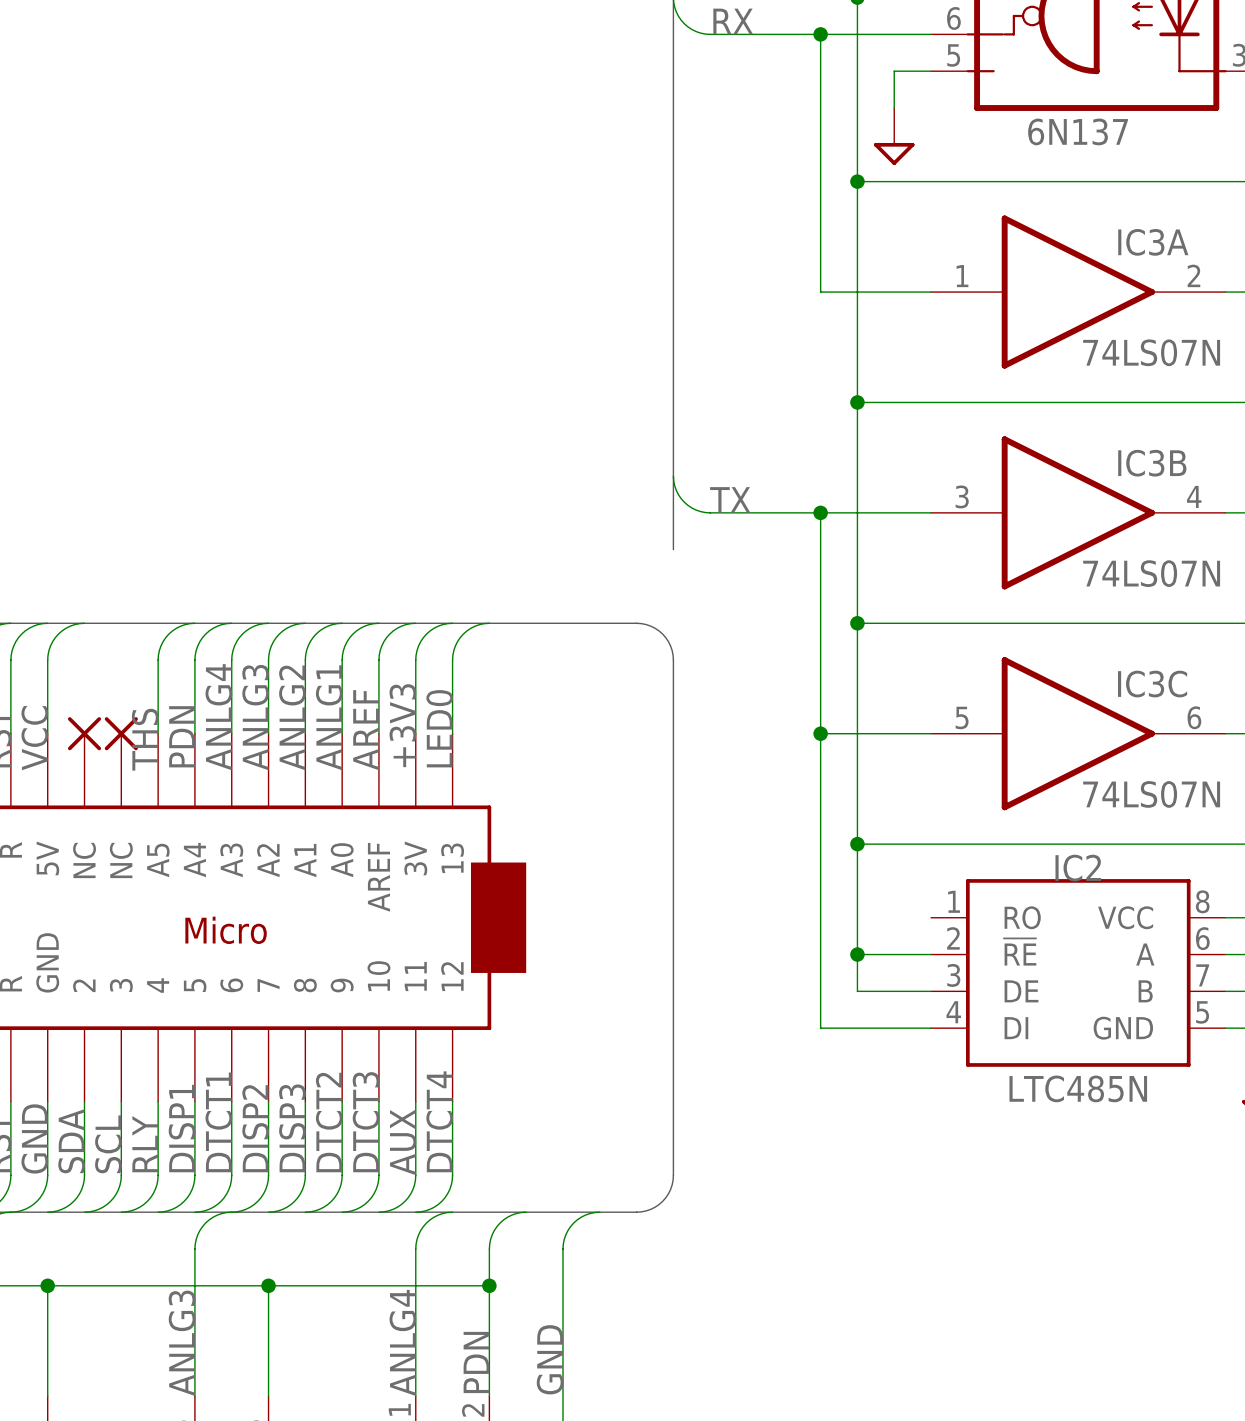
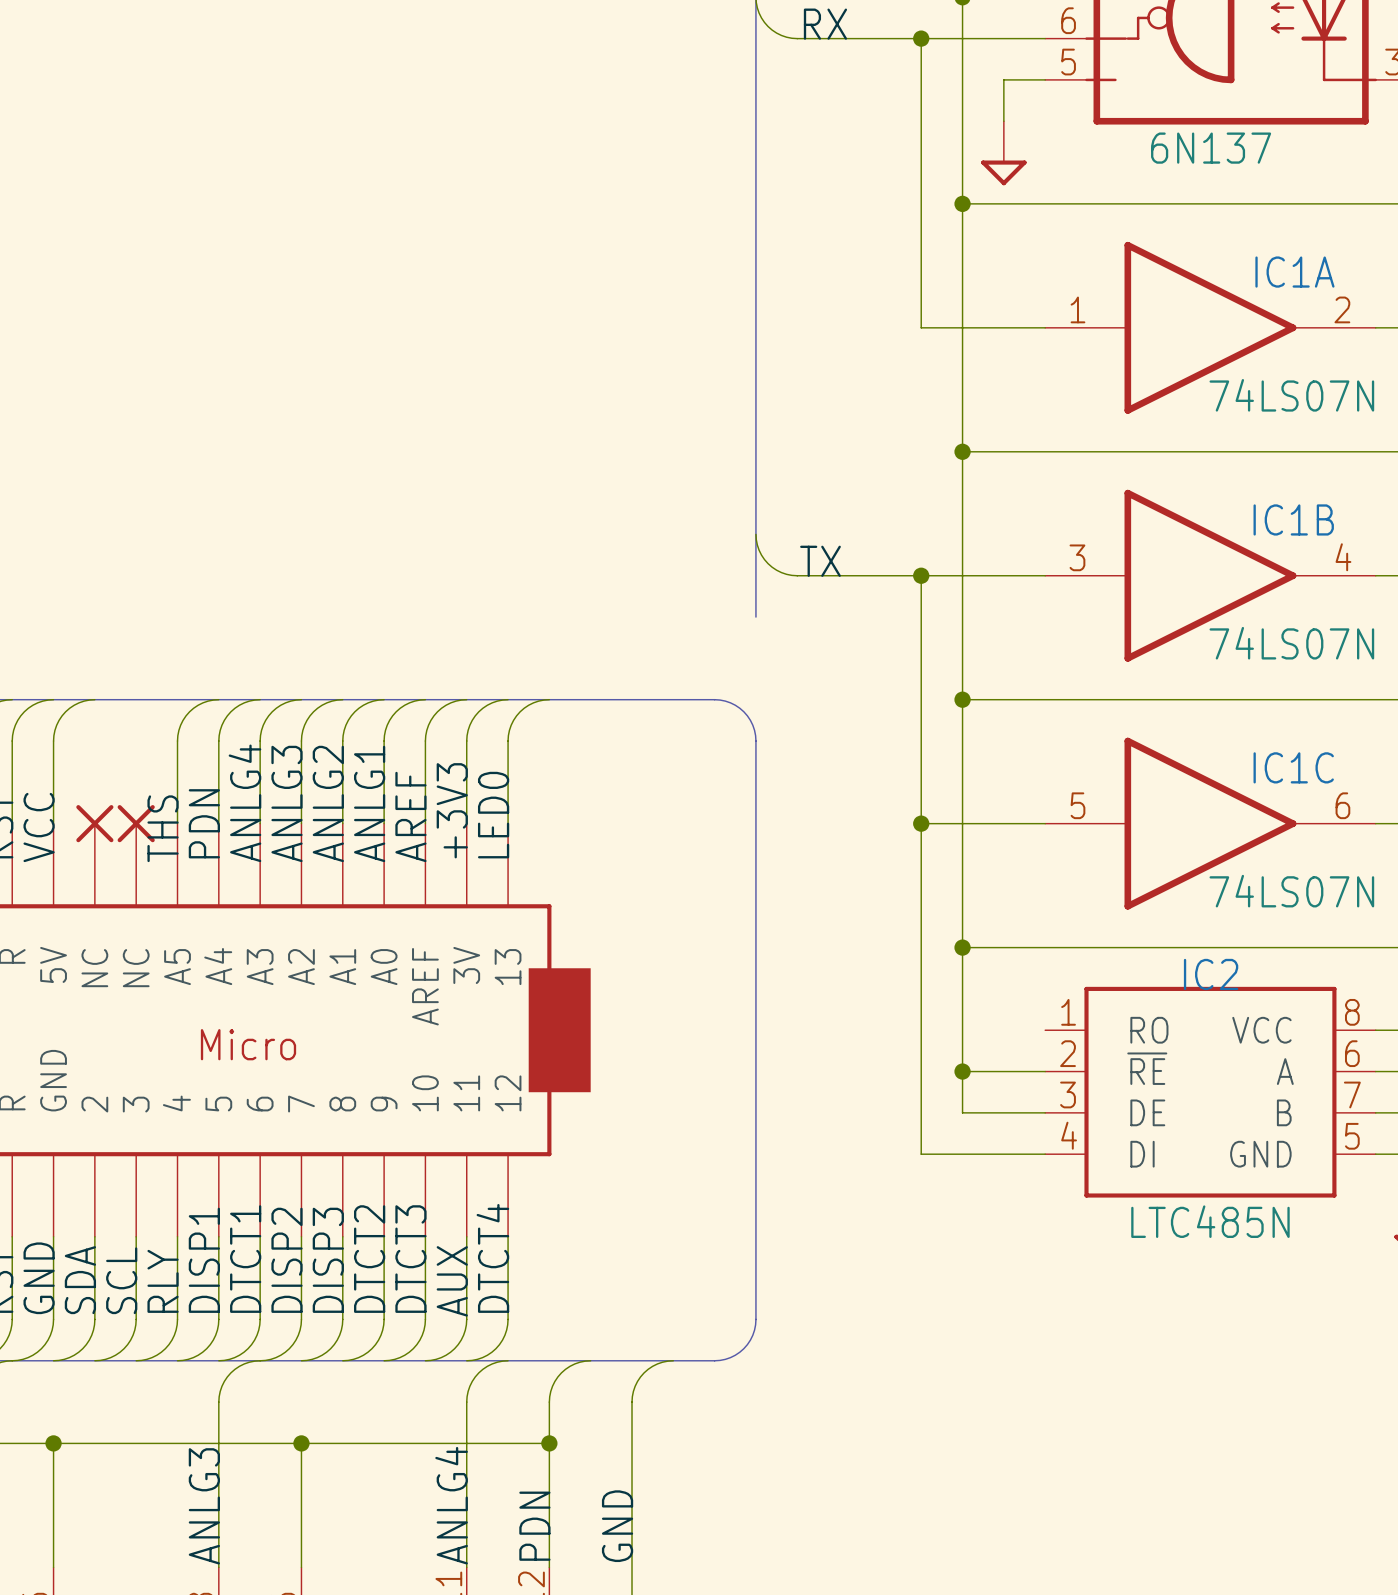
IC3A name: IC3A (1153, 242) -> IC1A (1294, 272)
IC3B name: IC3B (1152, 463) -> IC1B (1293, 519)
IC3C name: IC3C (1152, 684) -> IC1C (1293, 767)

